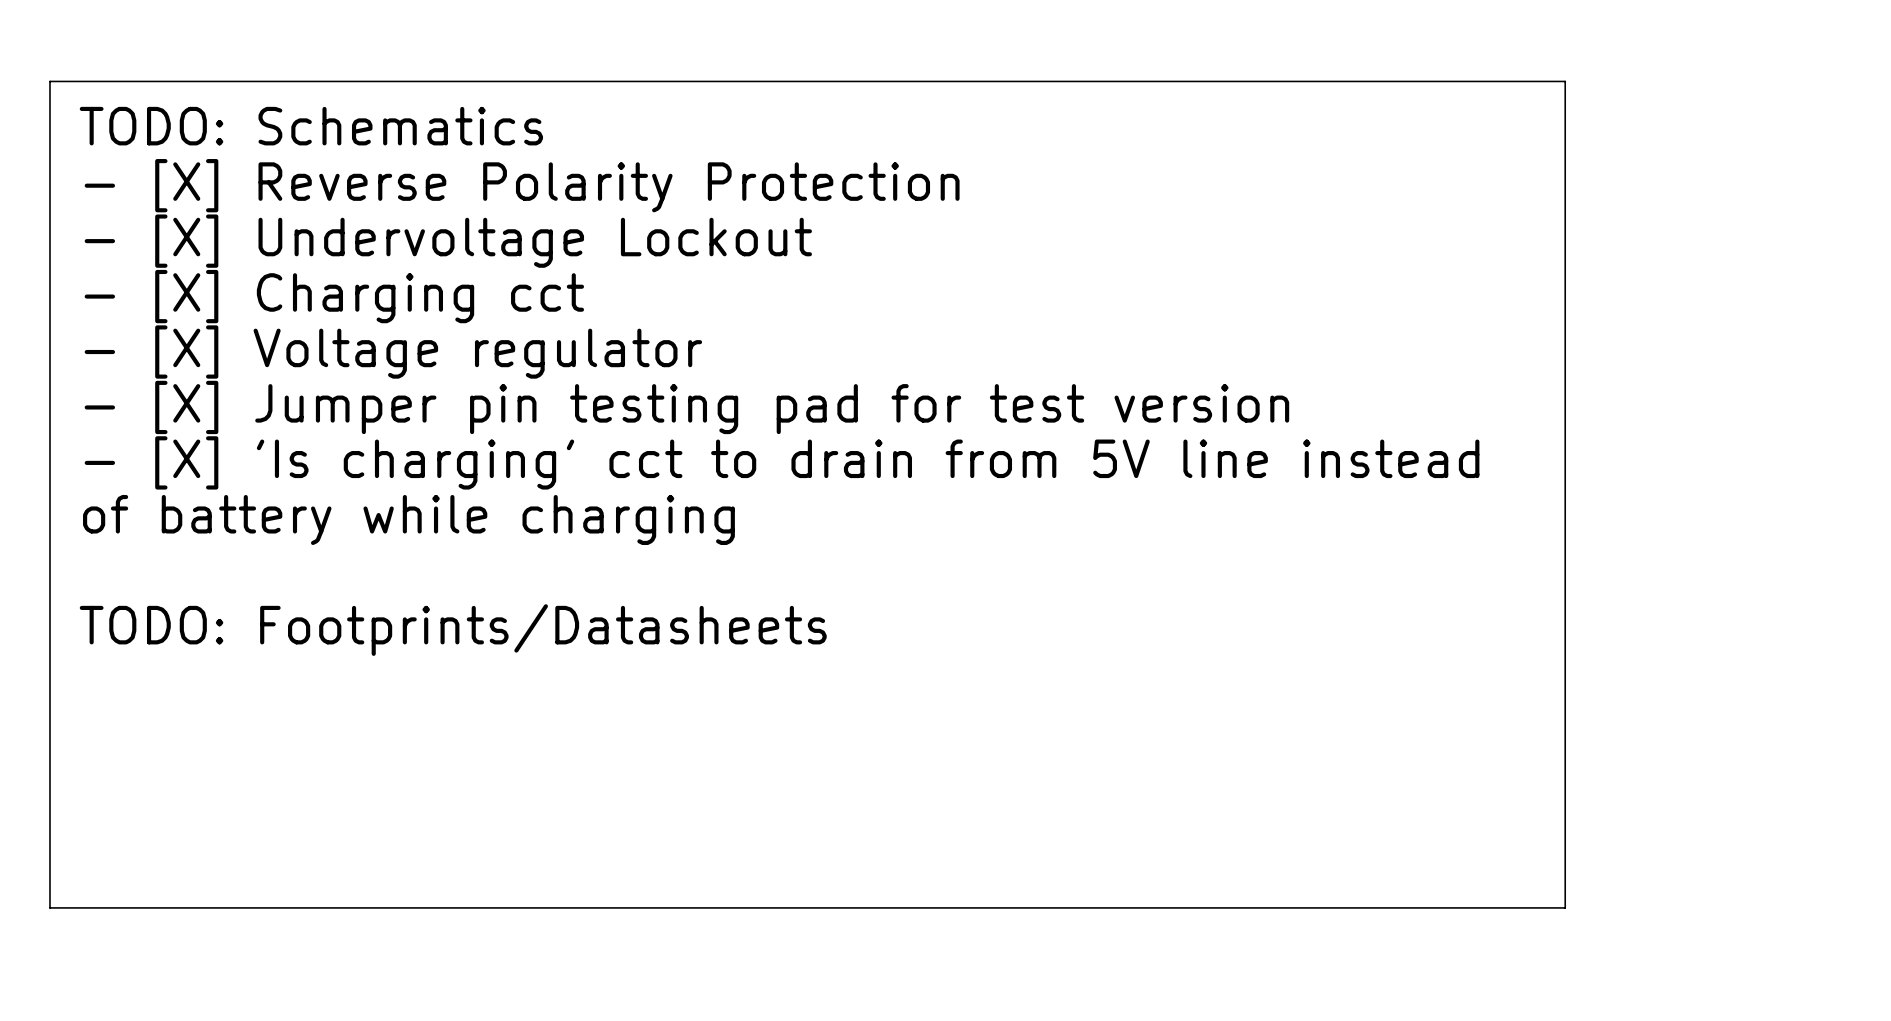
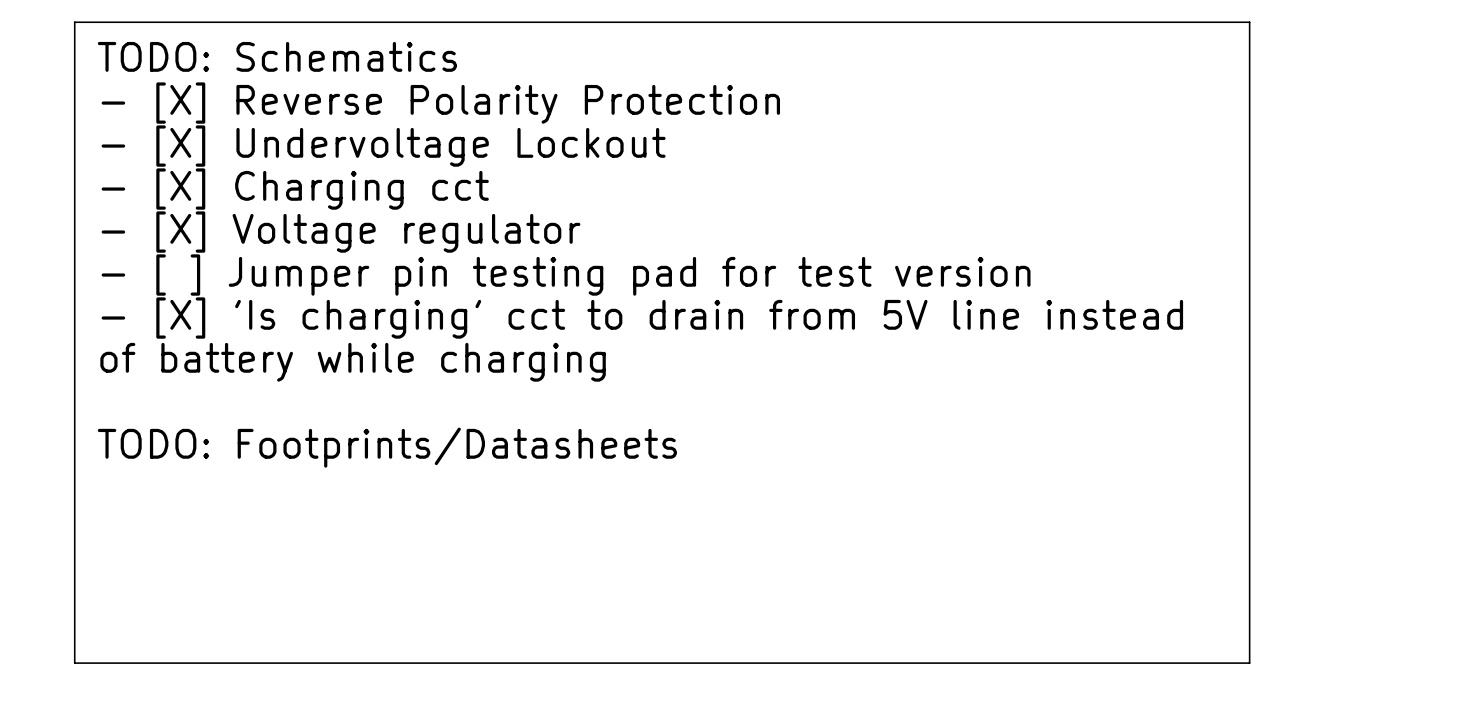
text: - [X] Jumper pin testing pad for test version (686, 407) -> - [ ] Jumper pin testing pad for test version (566, 275)

